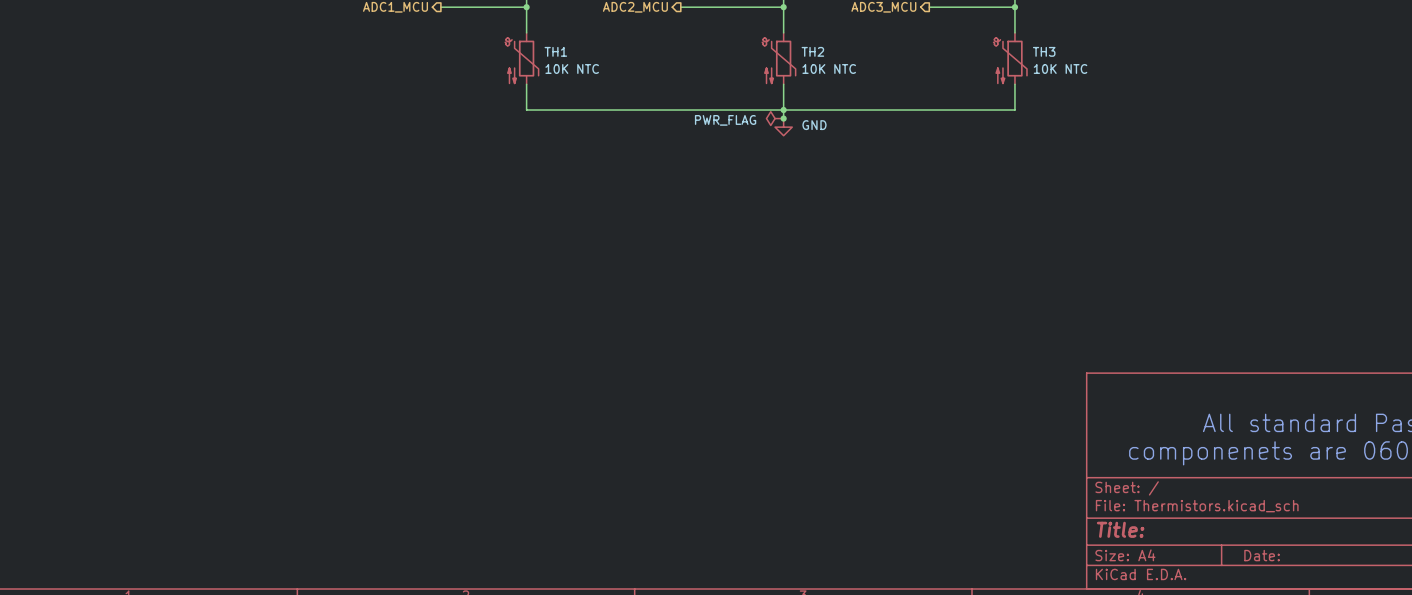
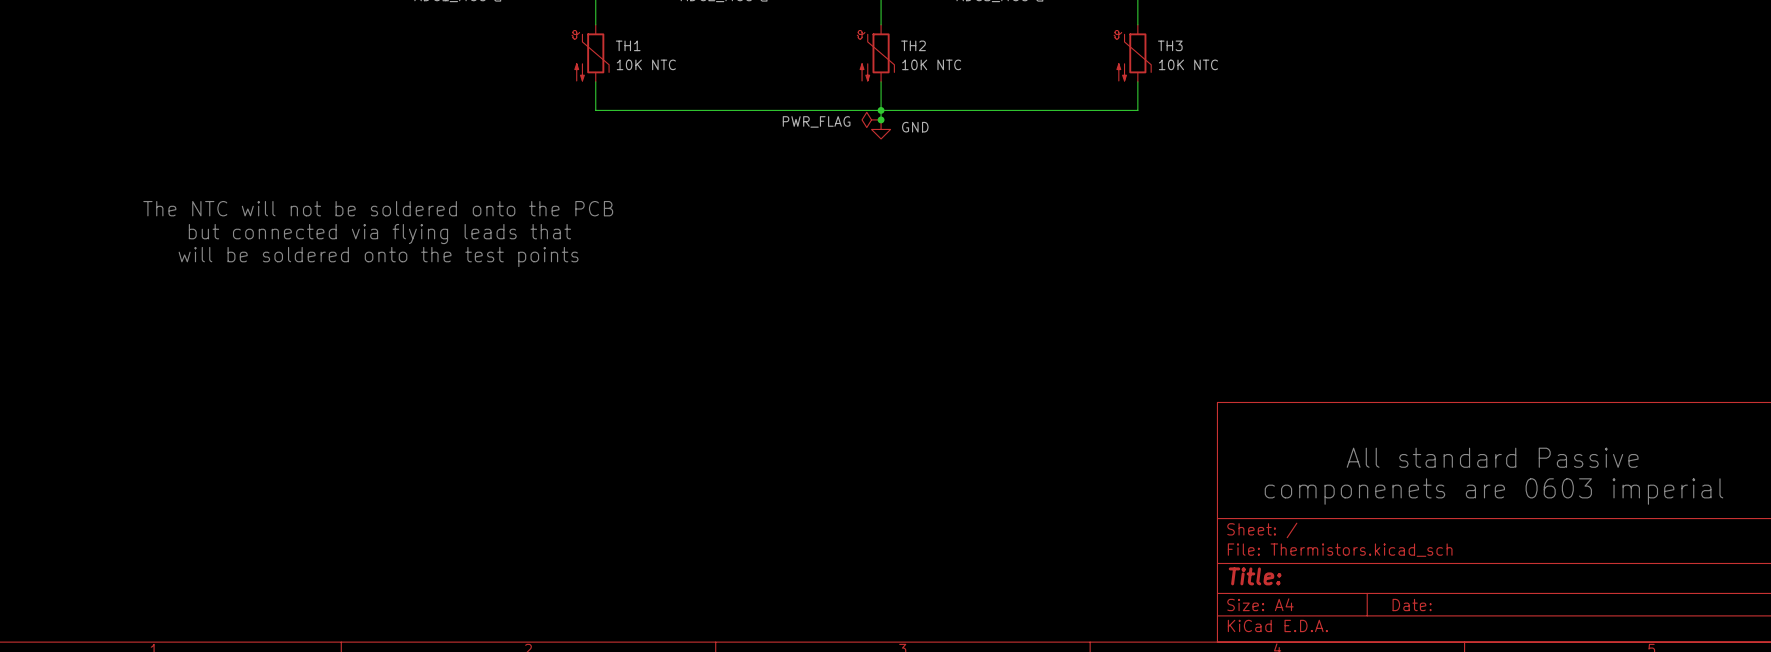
text: none -> The NTC will not be soldered onto the PCB (378, 208)
text: none -> but connected via flying leads that (379, 234)
text: none -> will be soldered onto the test points (378, 256)

